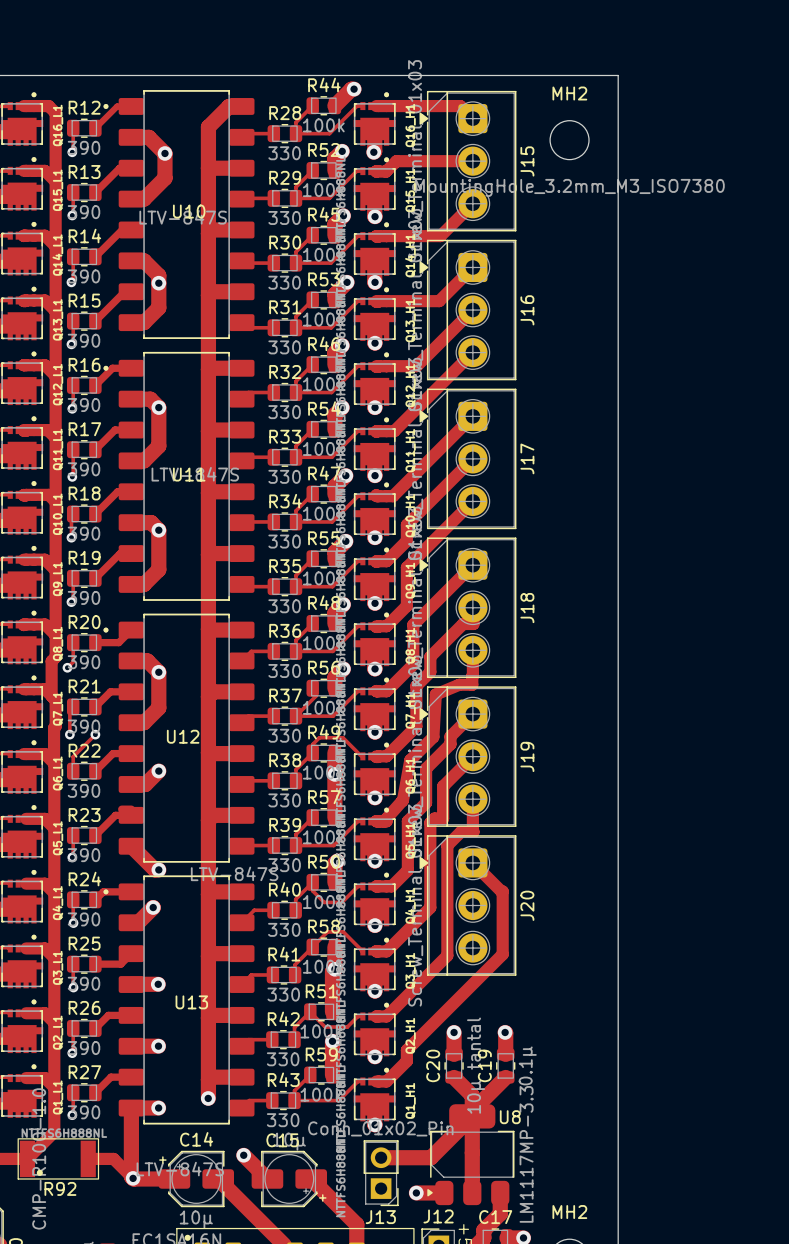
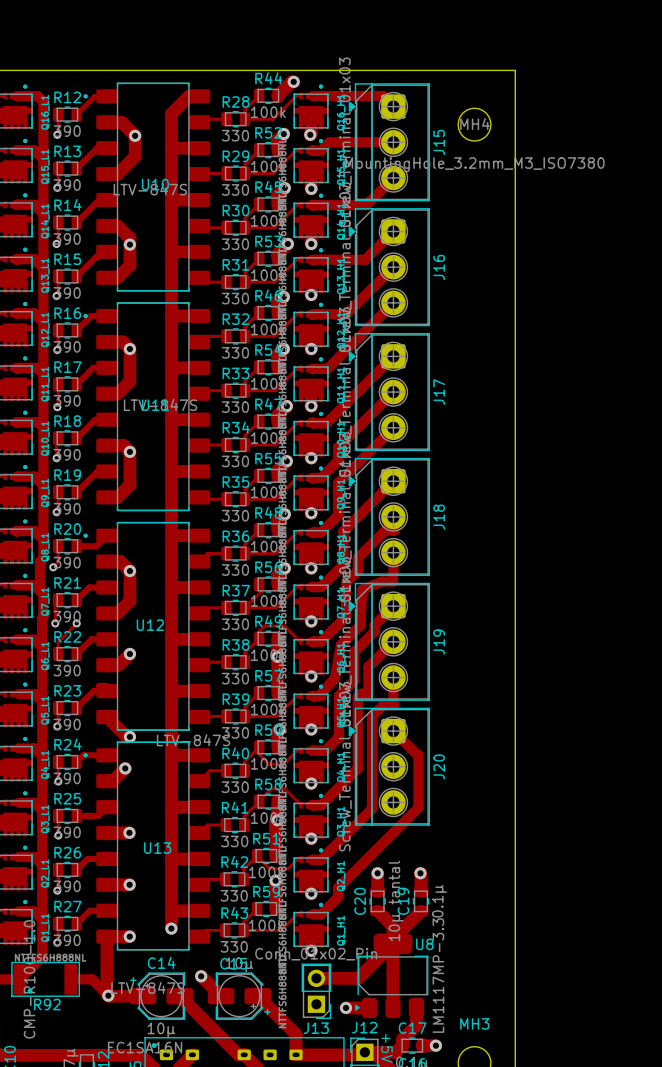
MH2 name: MH2 (569, 93) -> MH4 (475, 124)
MH2 name: MH2 (569, 1212) -> MH3 (474, 1023)

